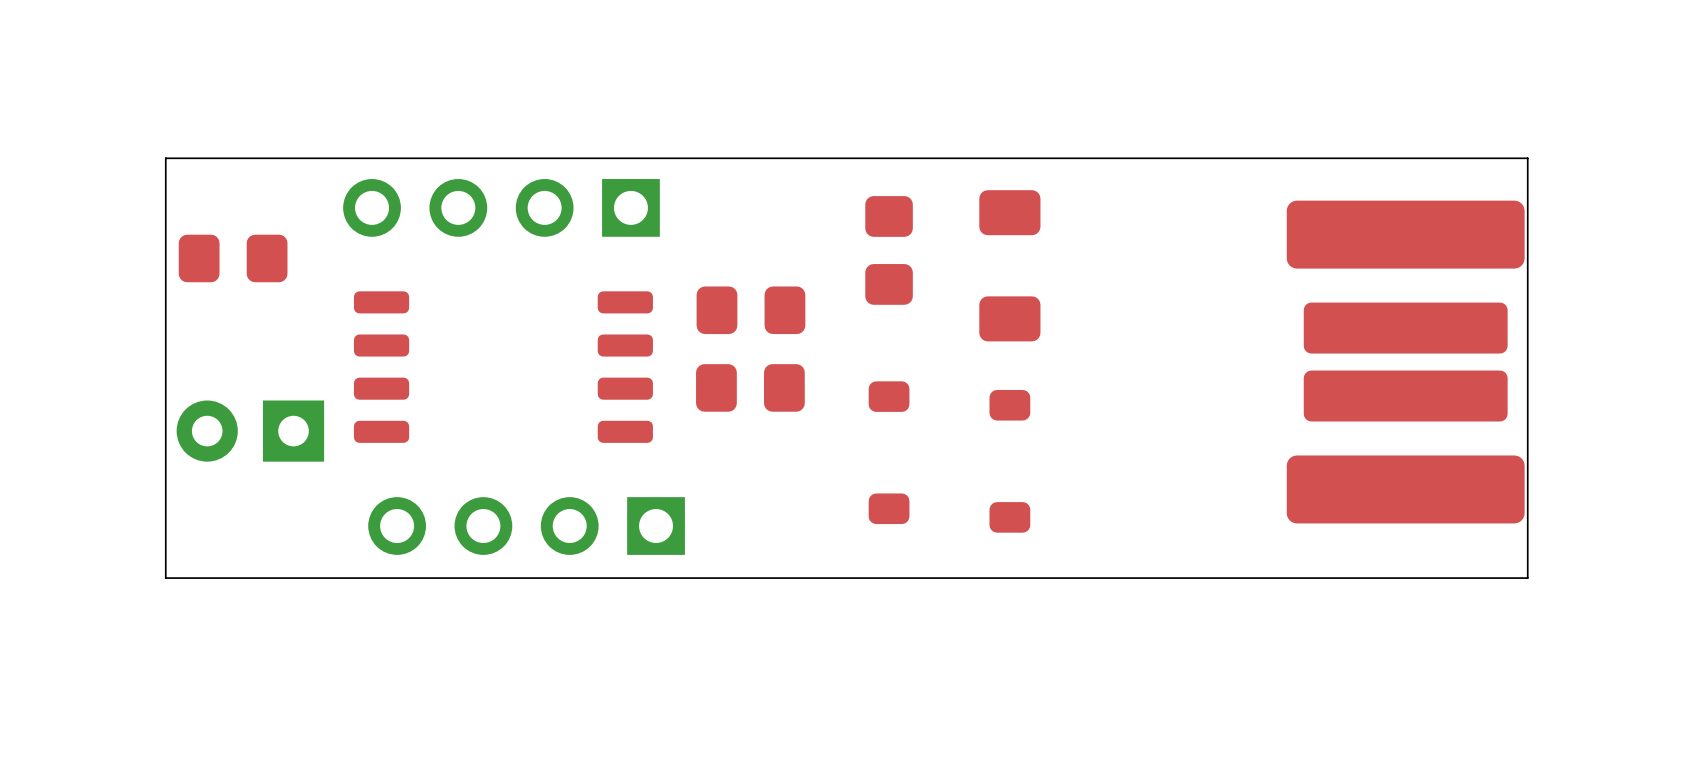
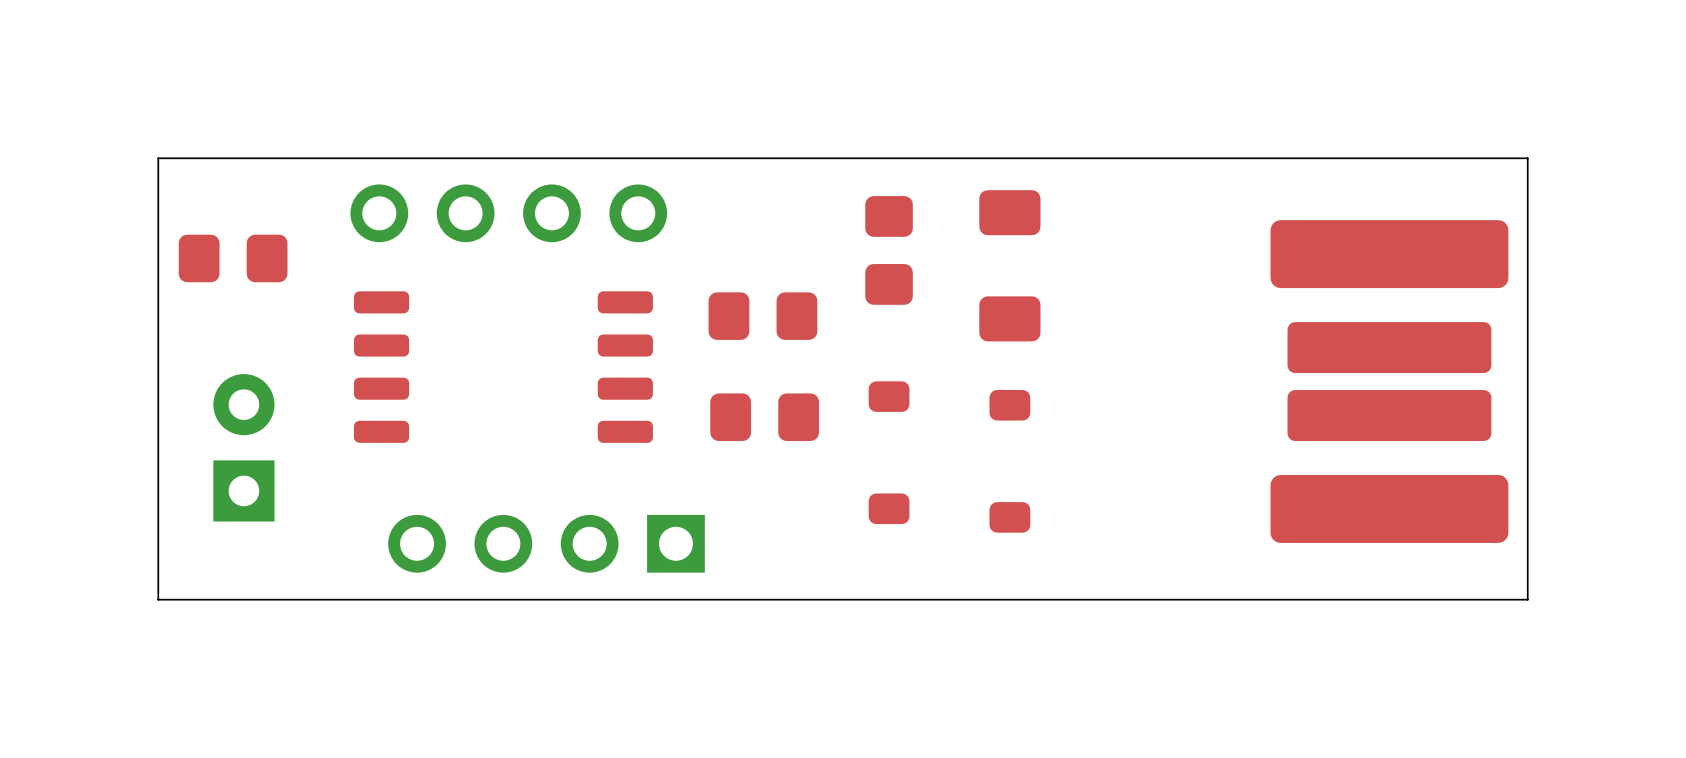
board edge: (165, 158) (165, 578) (1527, 578) -> (165, 158) (158, 158) (158, 599) (1527, 599) (1527, 578)
part footprint: [343, 179, 660, 237] -> [350, 184, 668, 243]
part position: (750, 310) -> (762, 316)
part position: (1405, 362) -> (1389, 381)
part position: (750, 387) -> (764, 417)
part rotation: 0° (250, 431) -> 90° clockwise (243, 447)
part position: (526, 526) -> (546, 543)

